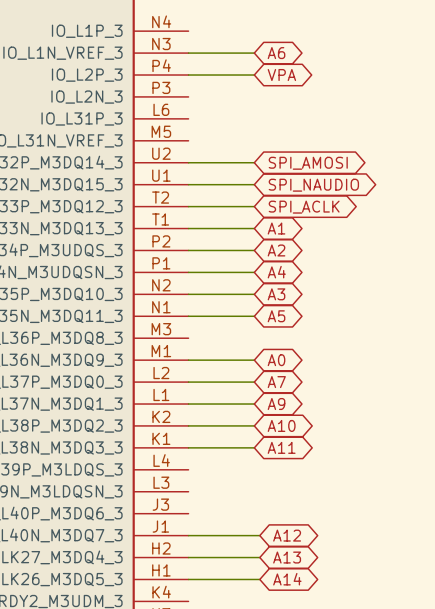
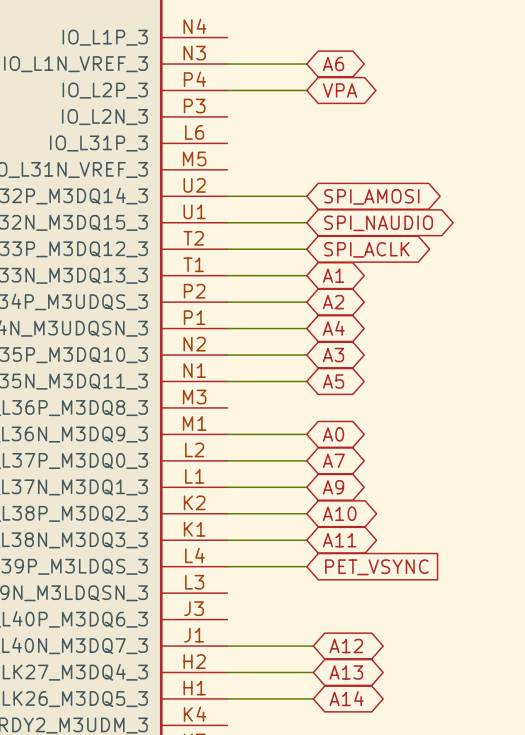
wire: none -> (227, 566) (306, 566)
global label: none -> PET_VSYNC (376, 567)

